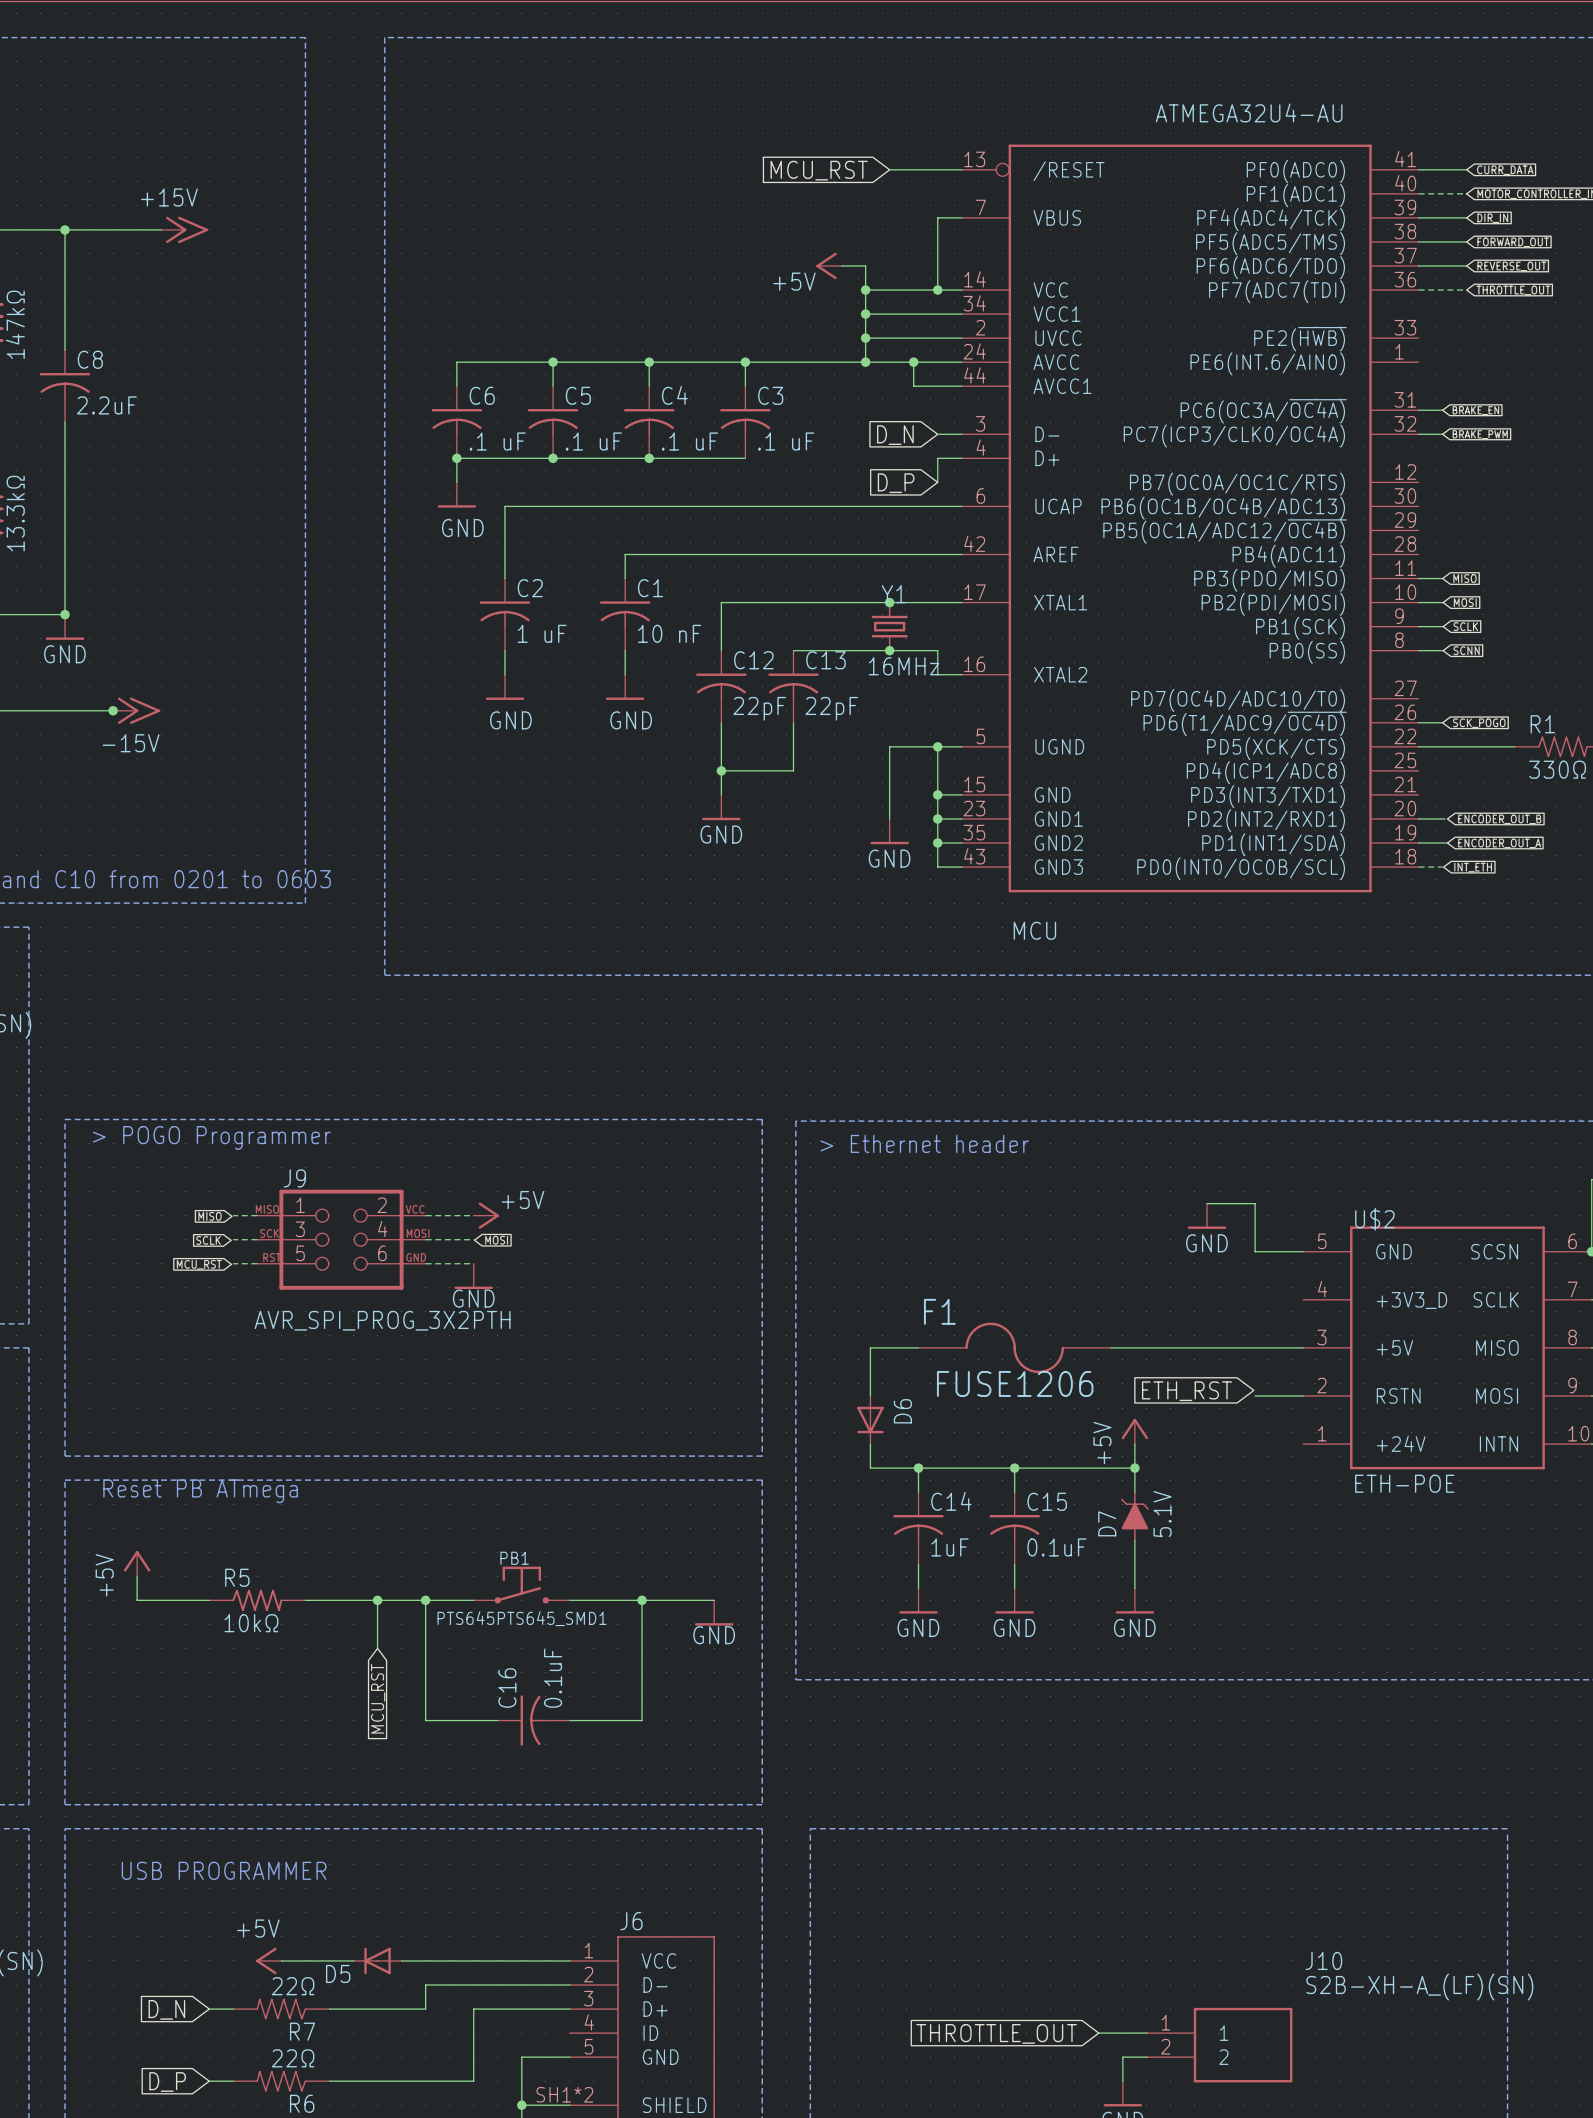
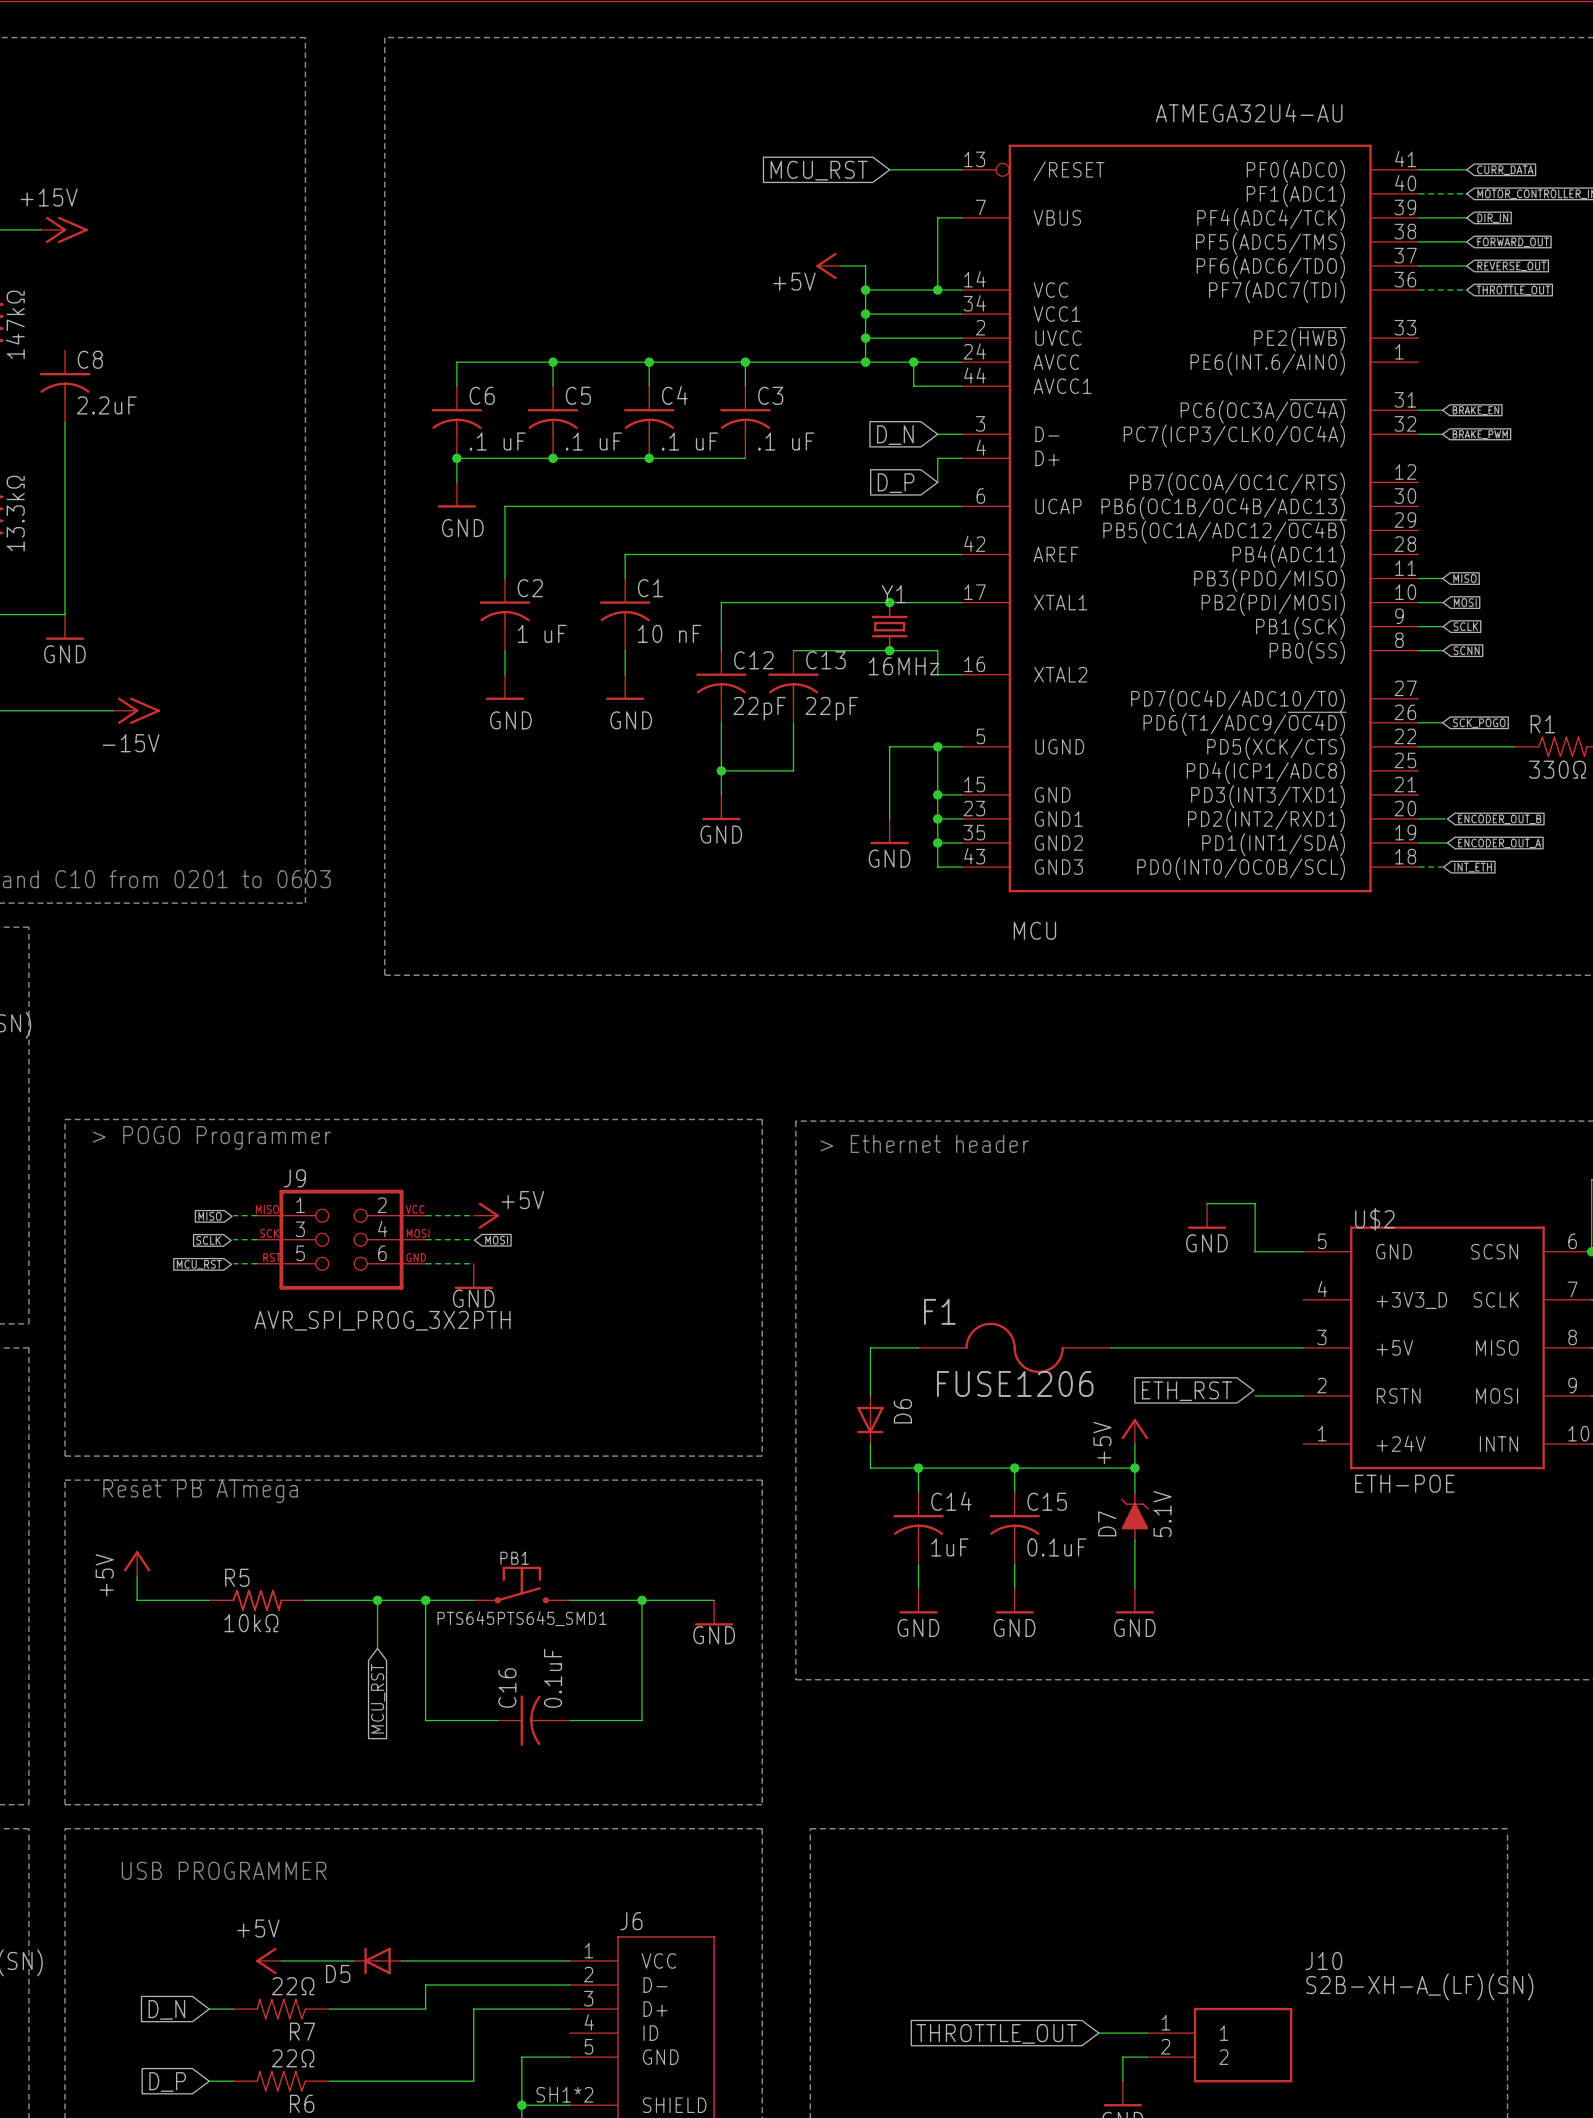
wire: (40, 229) (161, 229) -> none
wire: (65, 229) (65, 350) -> none
junction: (65, 229) -> none
power symbol position: +15V (184, 229) -> +15V (64, 229)
junction: (65, 614) -> none
junction: (113, 710) -> none

